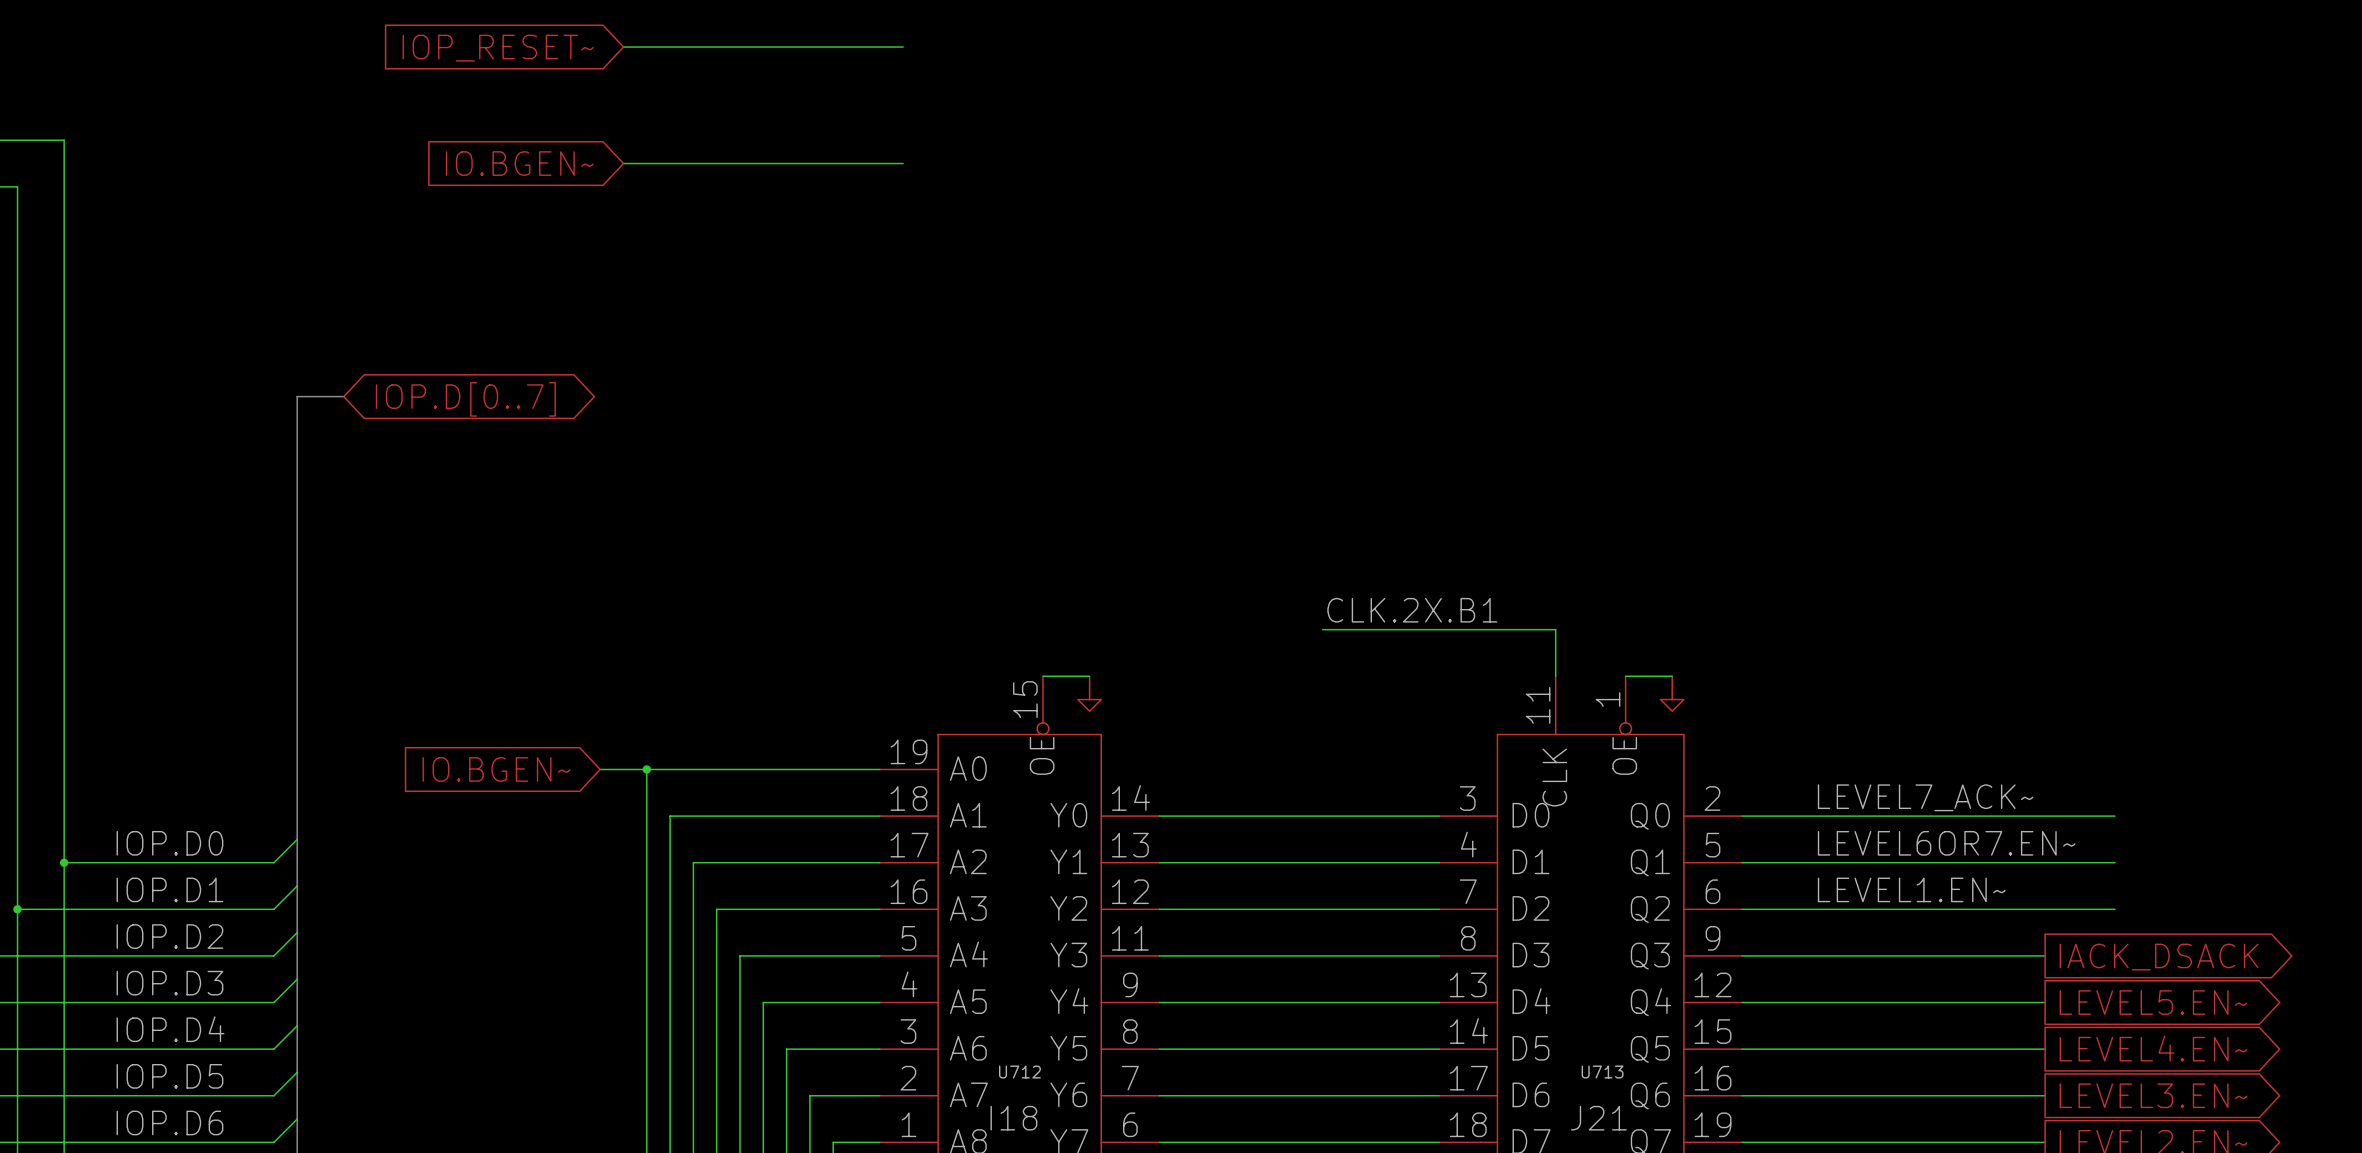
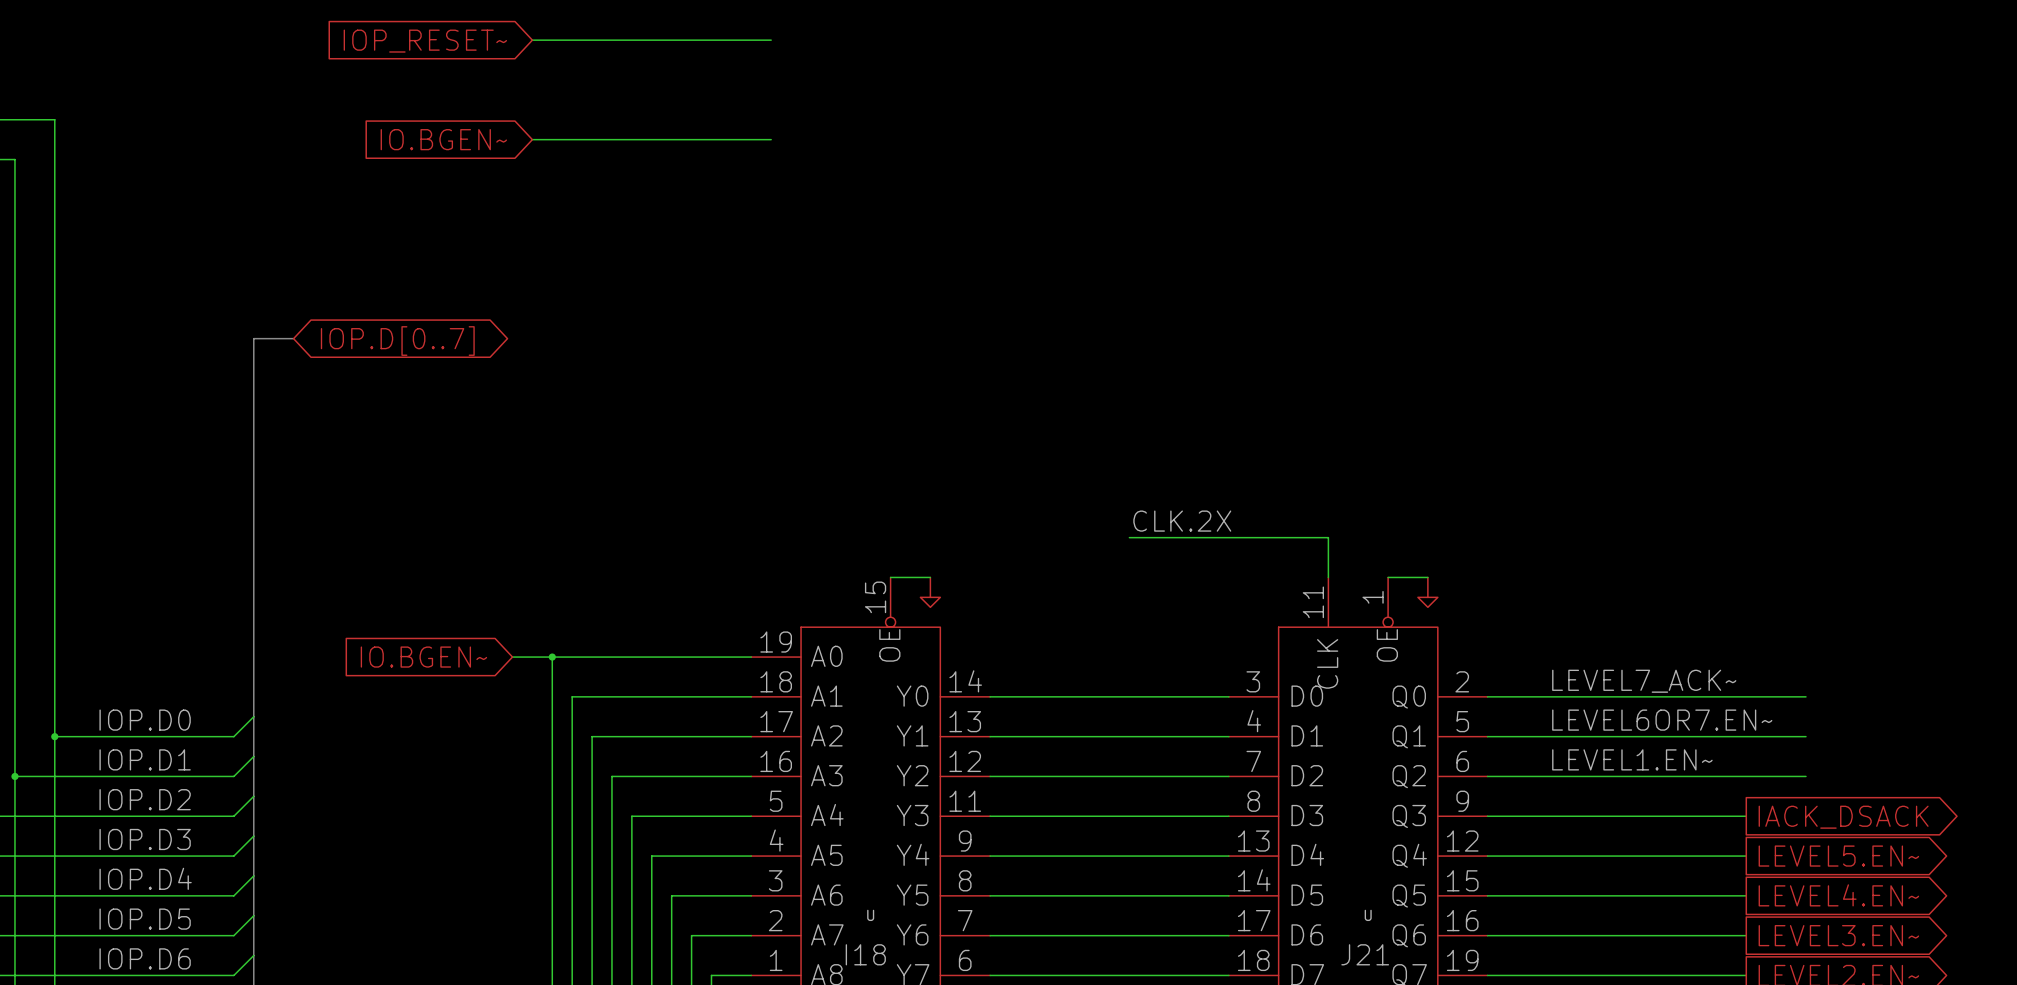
label: CLK.2X.B1 (1412, 610) -> CLK.2X (1182, 521)
U712 name: U712 (1019, 1072) -> U (870, 915)
U713 name: U713 (1602, 1072) -> U (1368, 915)

